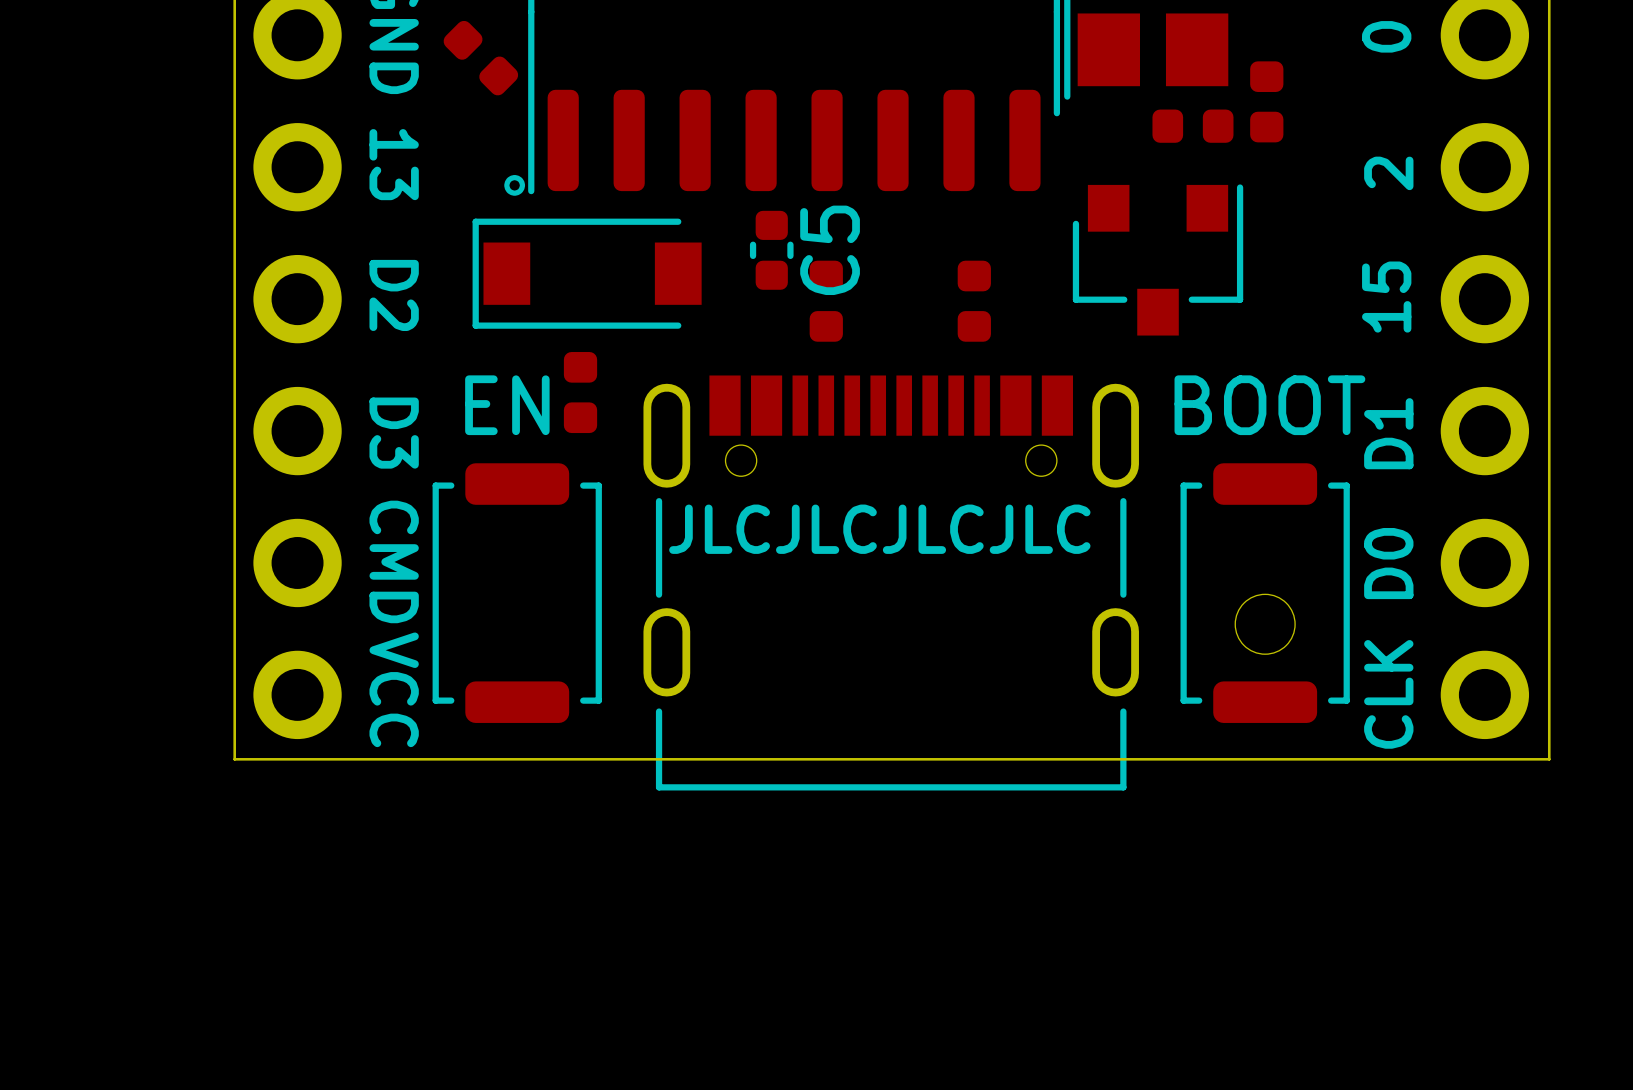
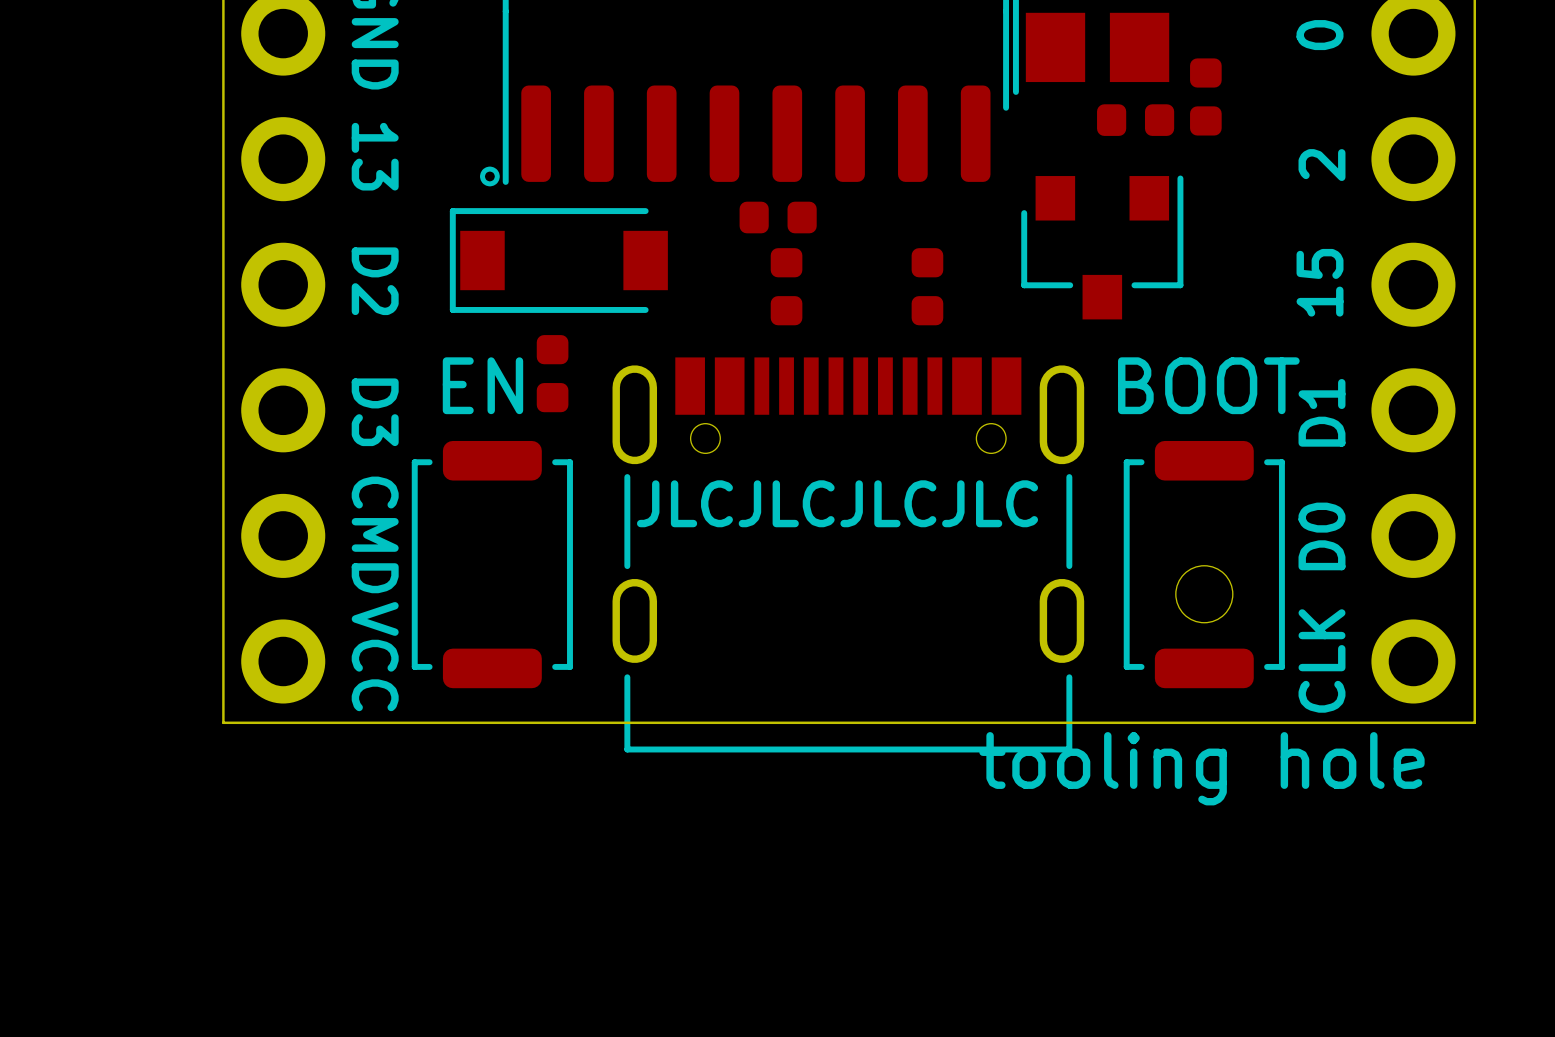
part: (480, 58) -> none
part: none -> (778, 217)
C5: (771, 250) -> none
part text: none -> tooling hole (1201, 768)

